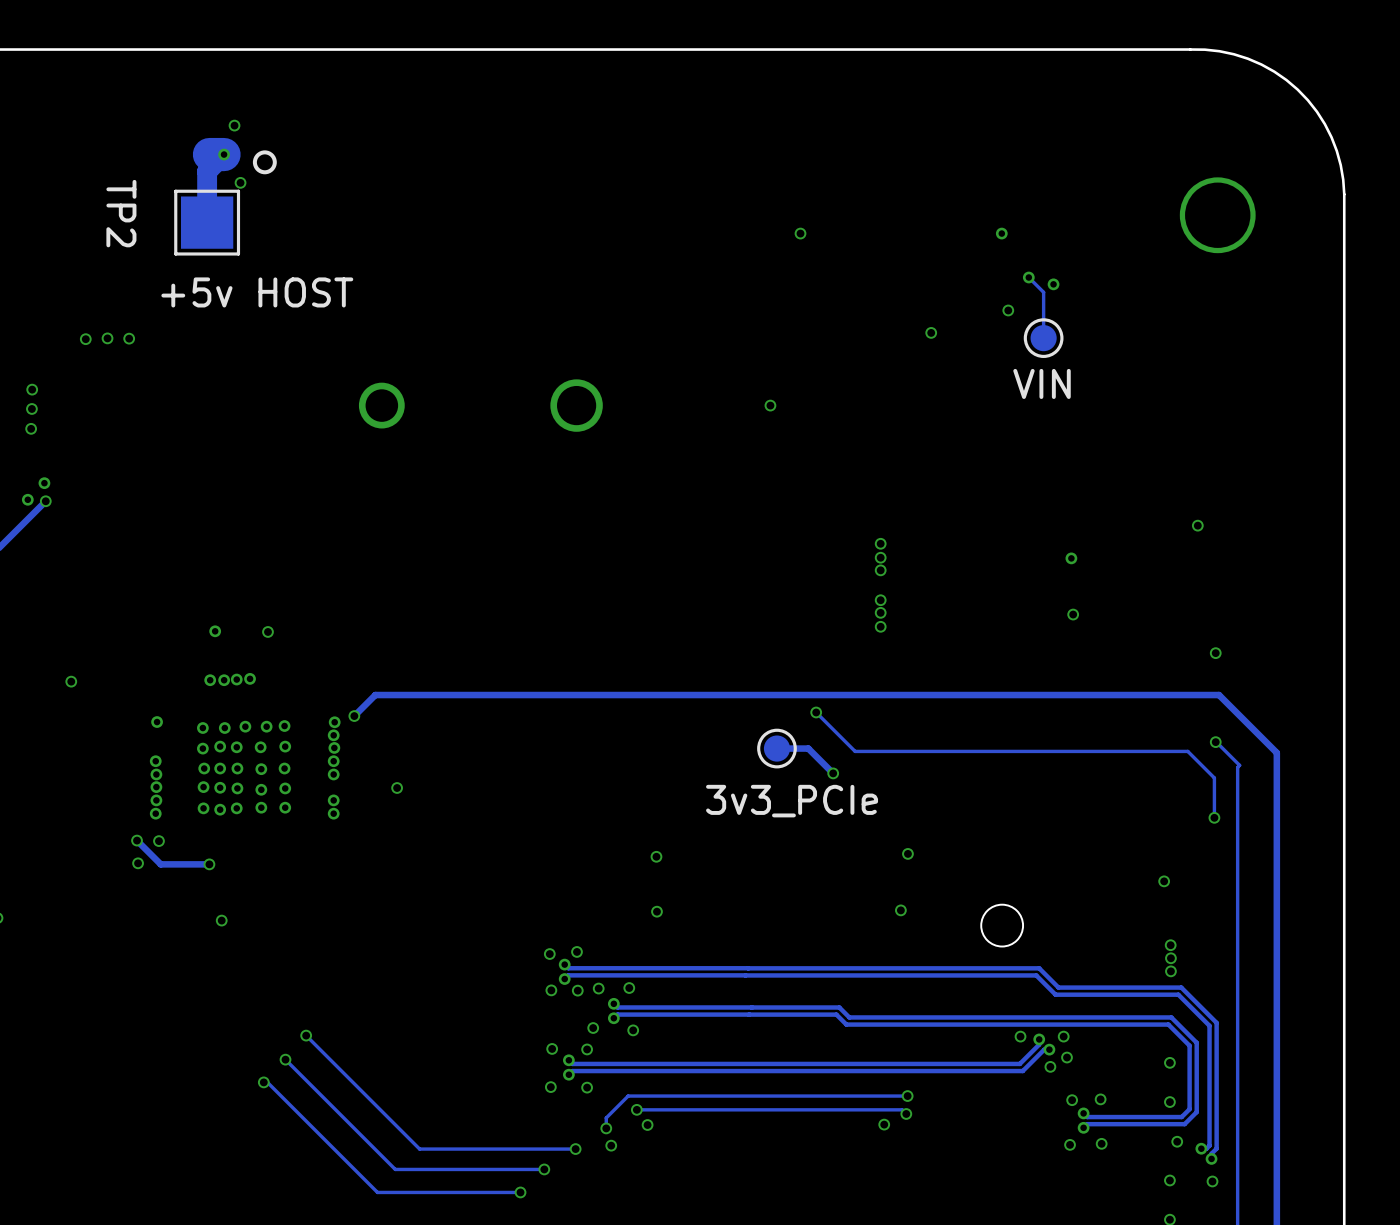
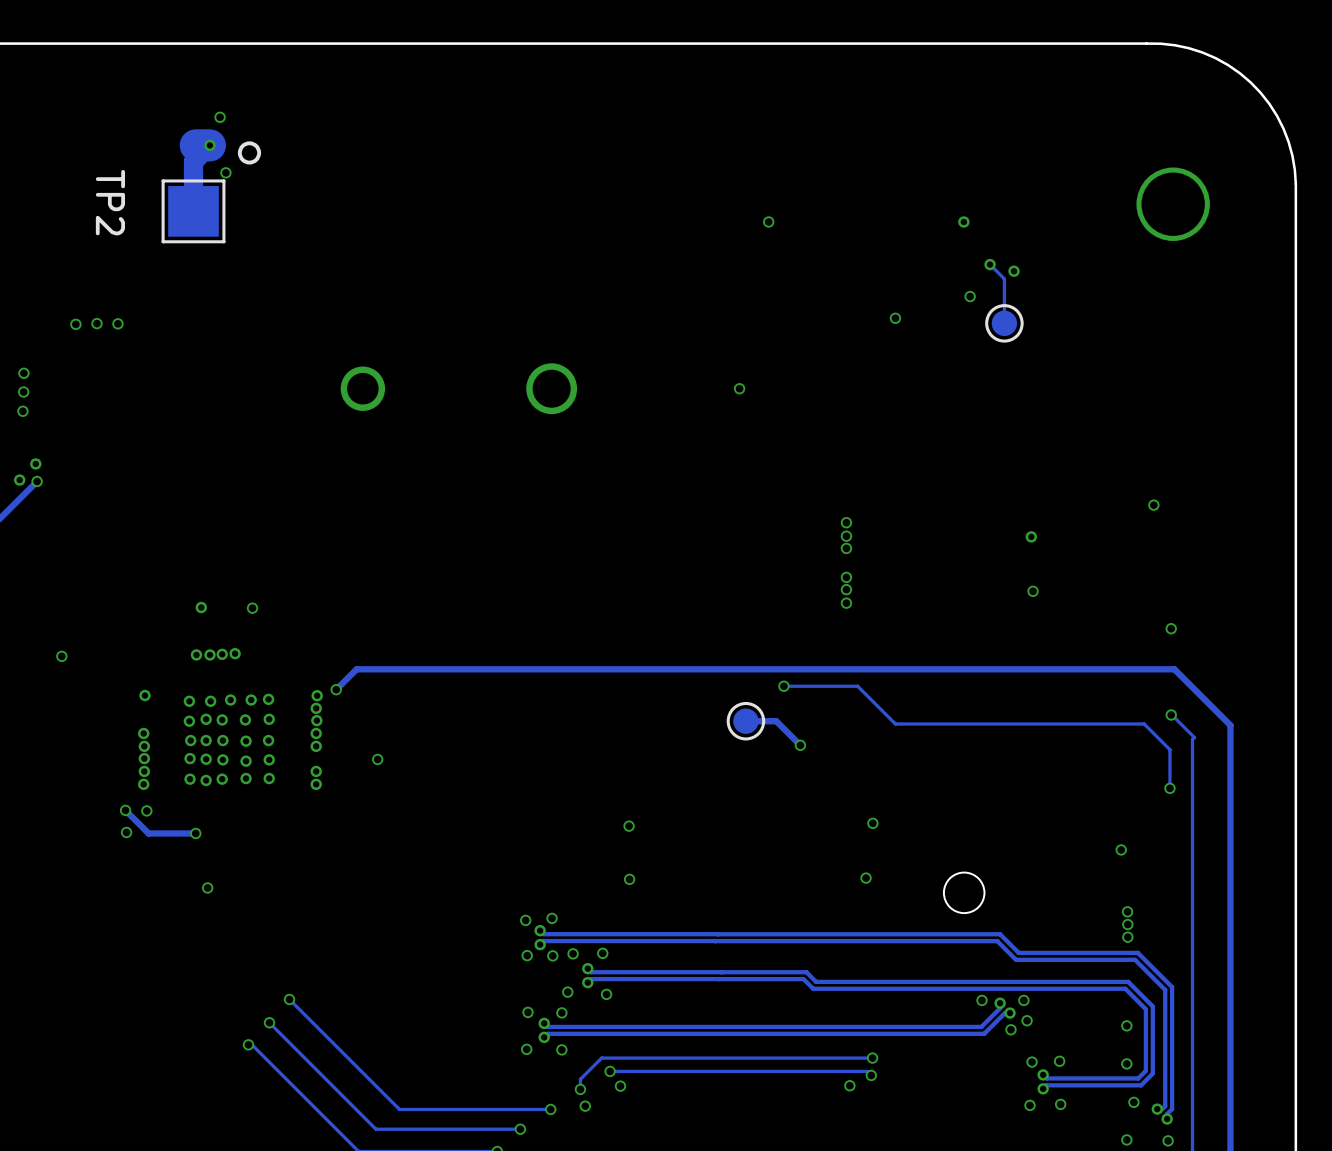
TP2 value: +5v HOST (257, 292) -> none
part value: VIN (1042, 383) -> none
track: (816, 712) (855, 751) (931, 751) -> (783, 686) (857, 686) (895, 723)
part value: 3v3_PCIe (792, 801) -> none

